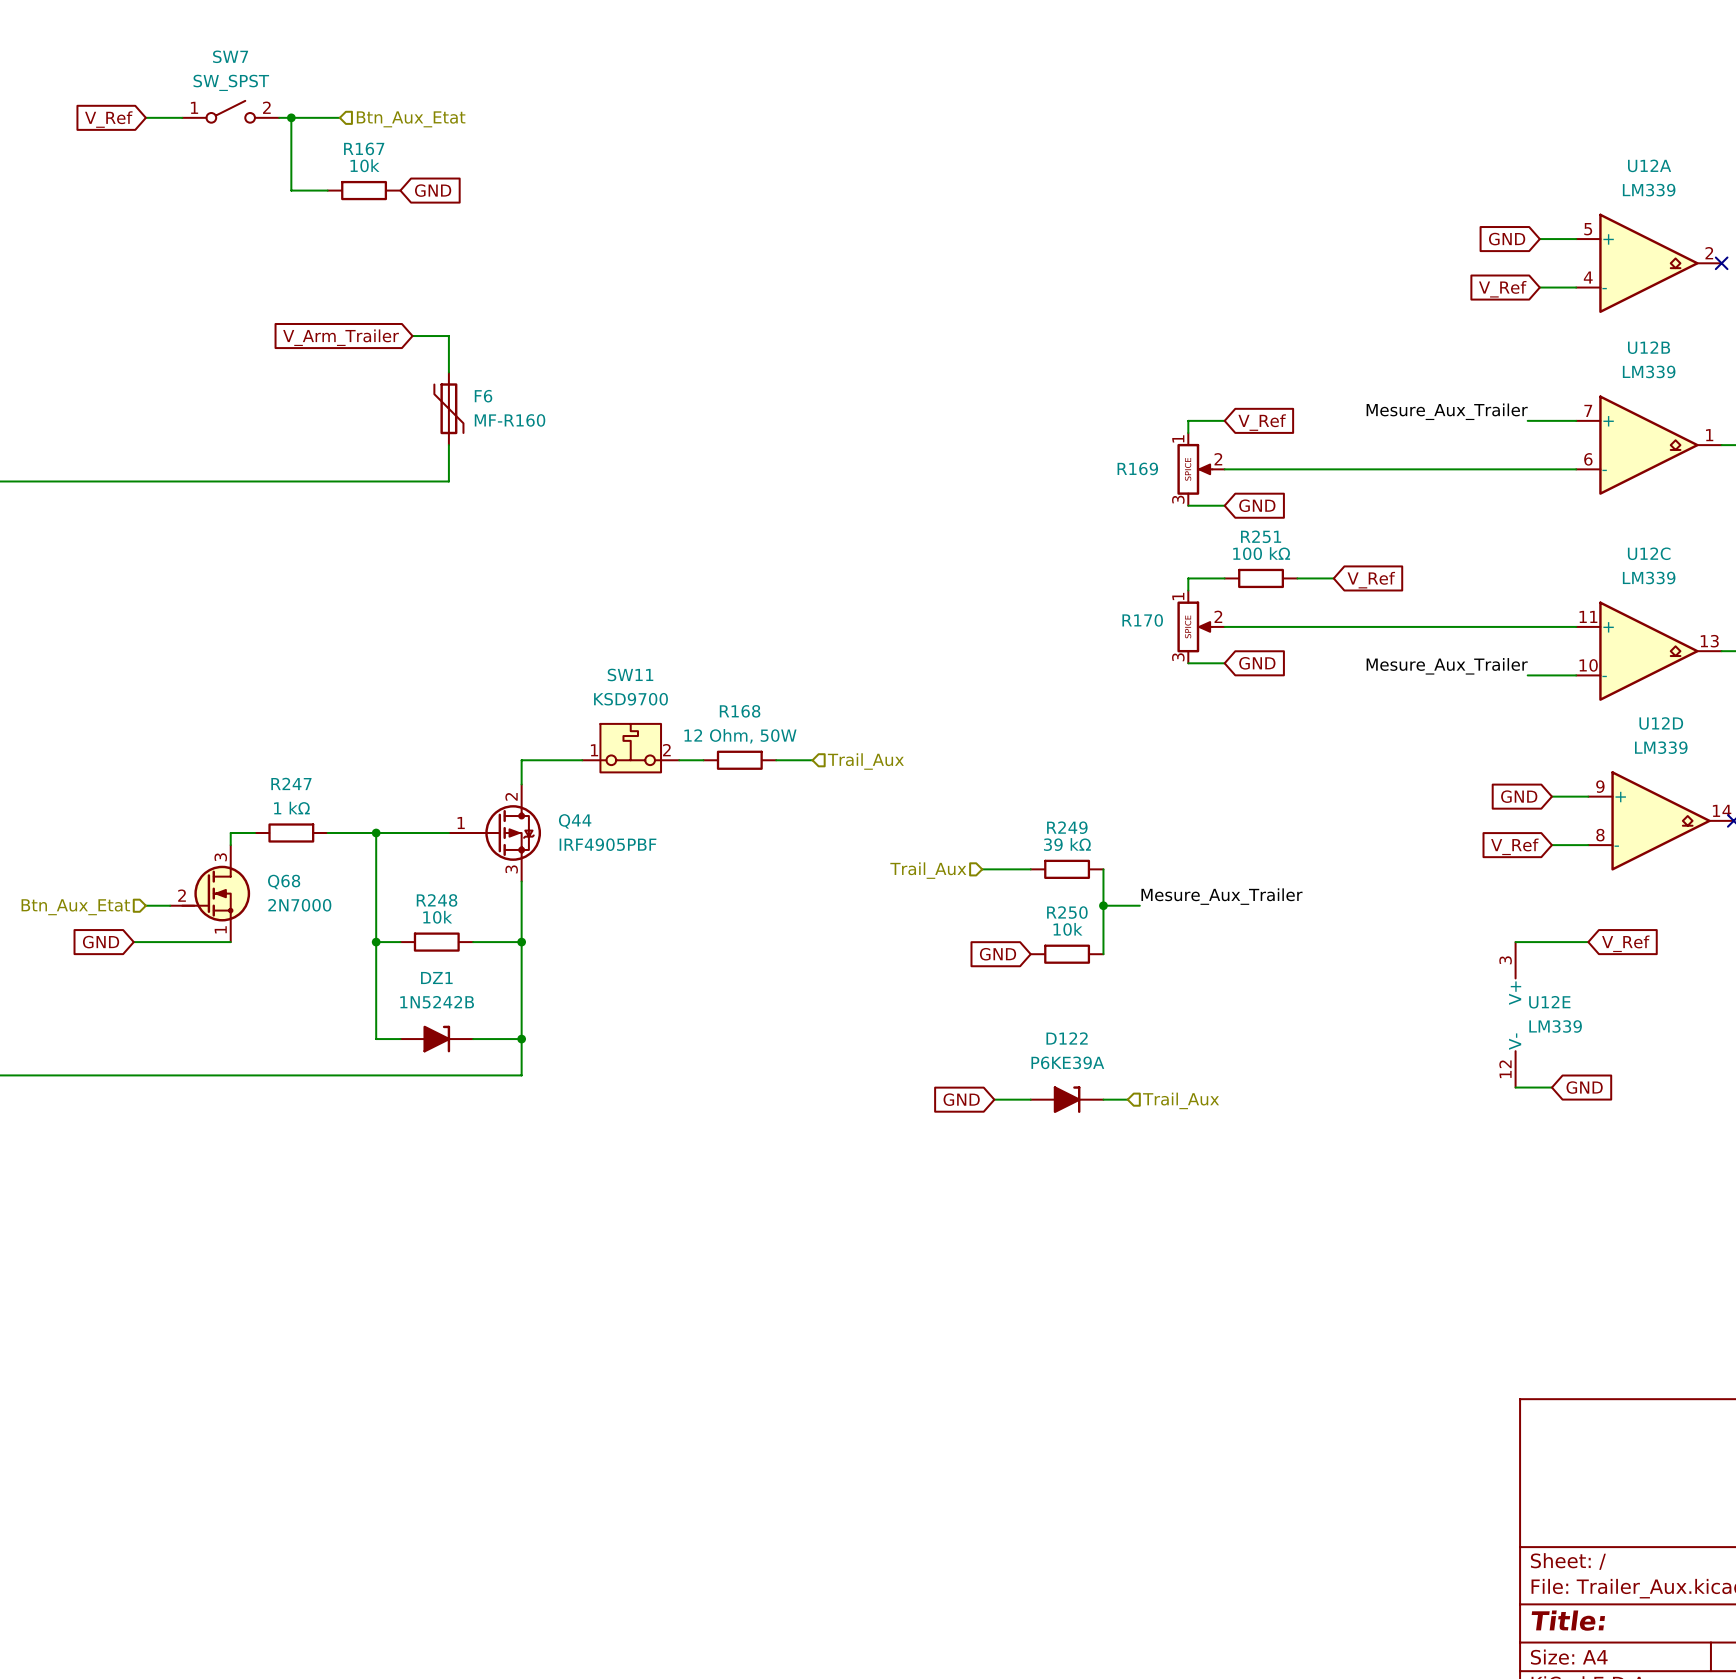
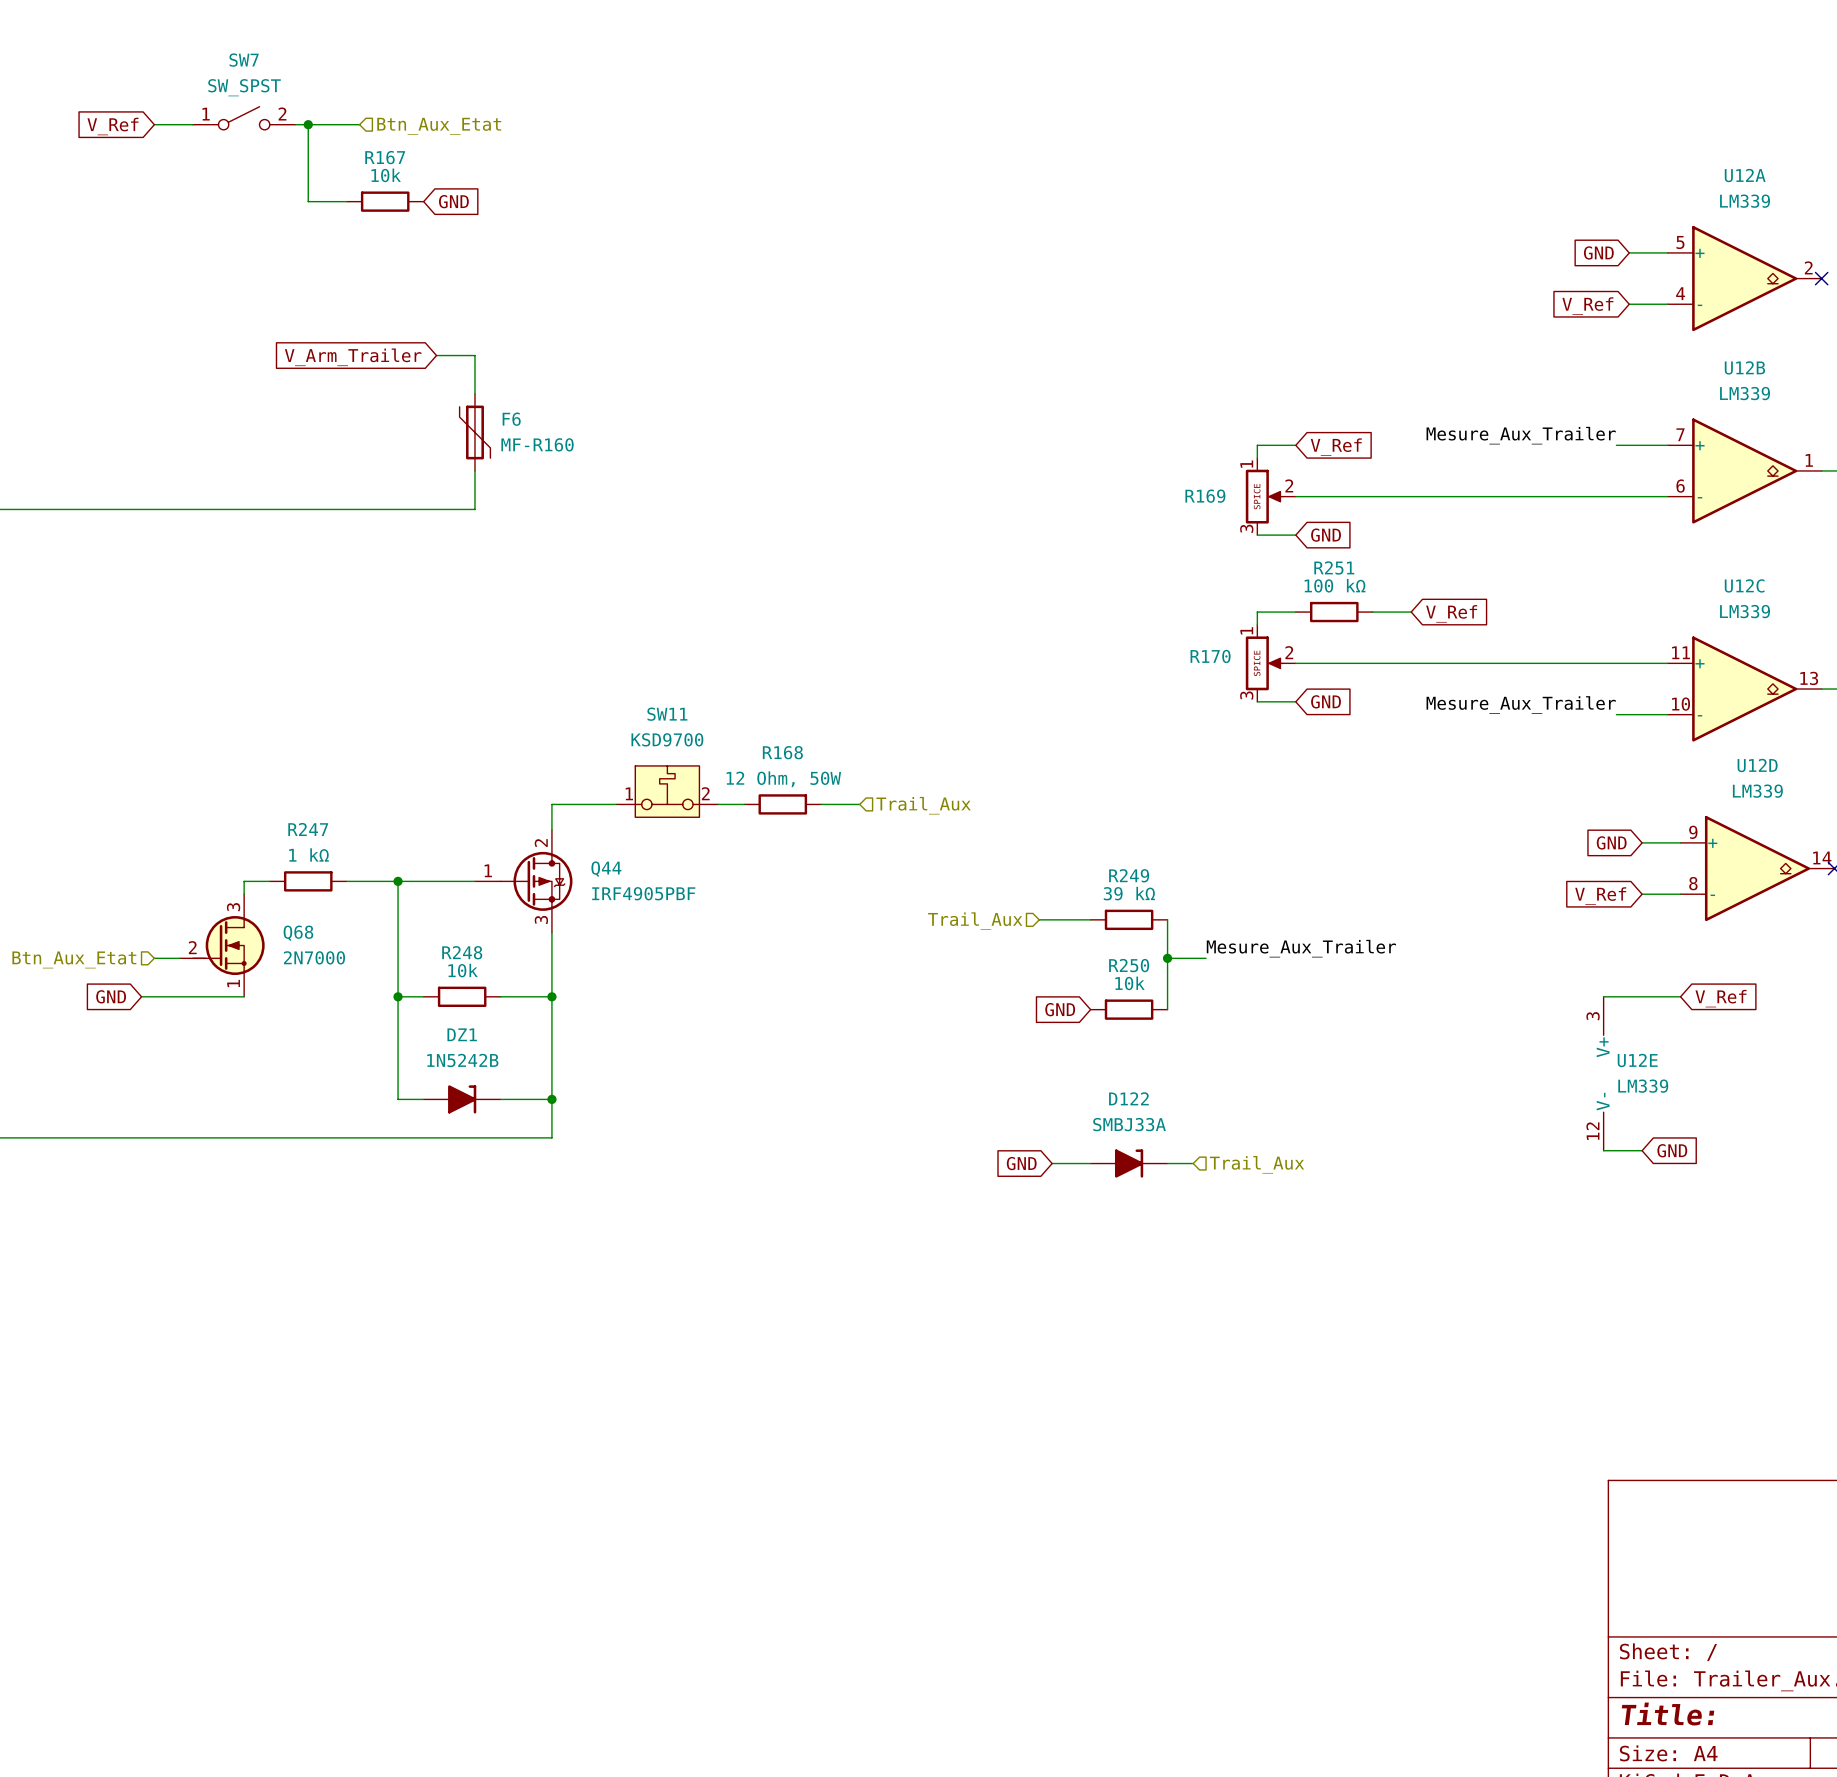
D122 value: P6KE39A (1067, 1062) -> SMBJ33A (1129, 1124)

